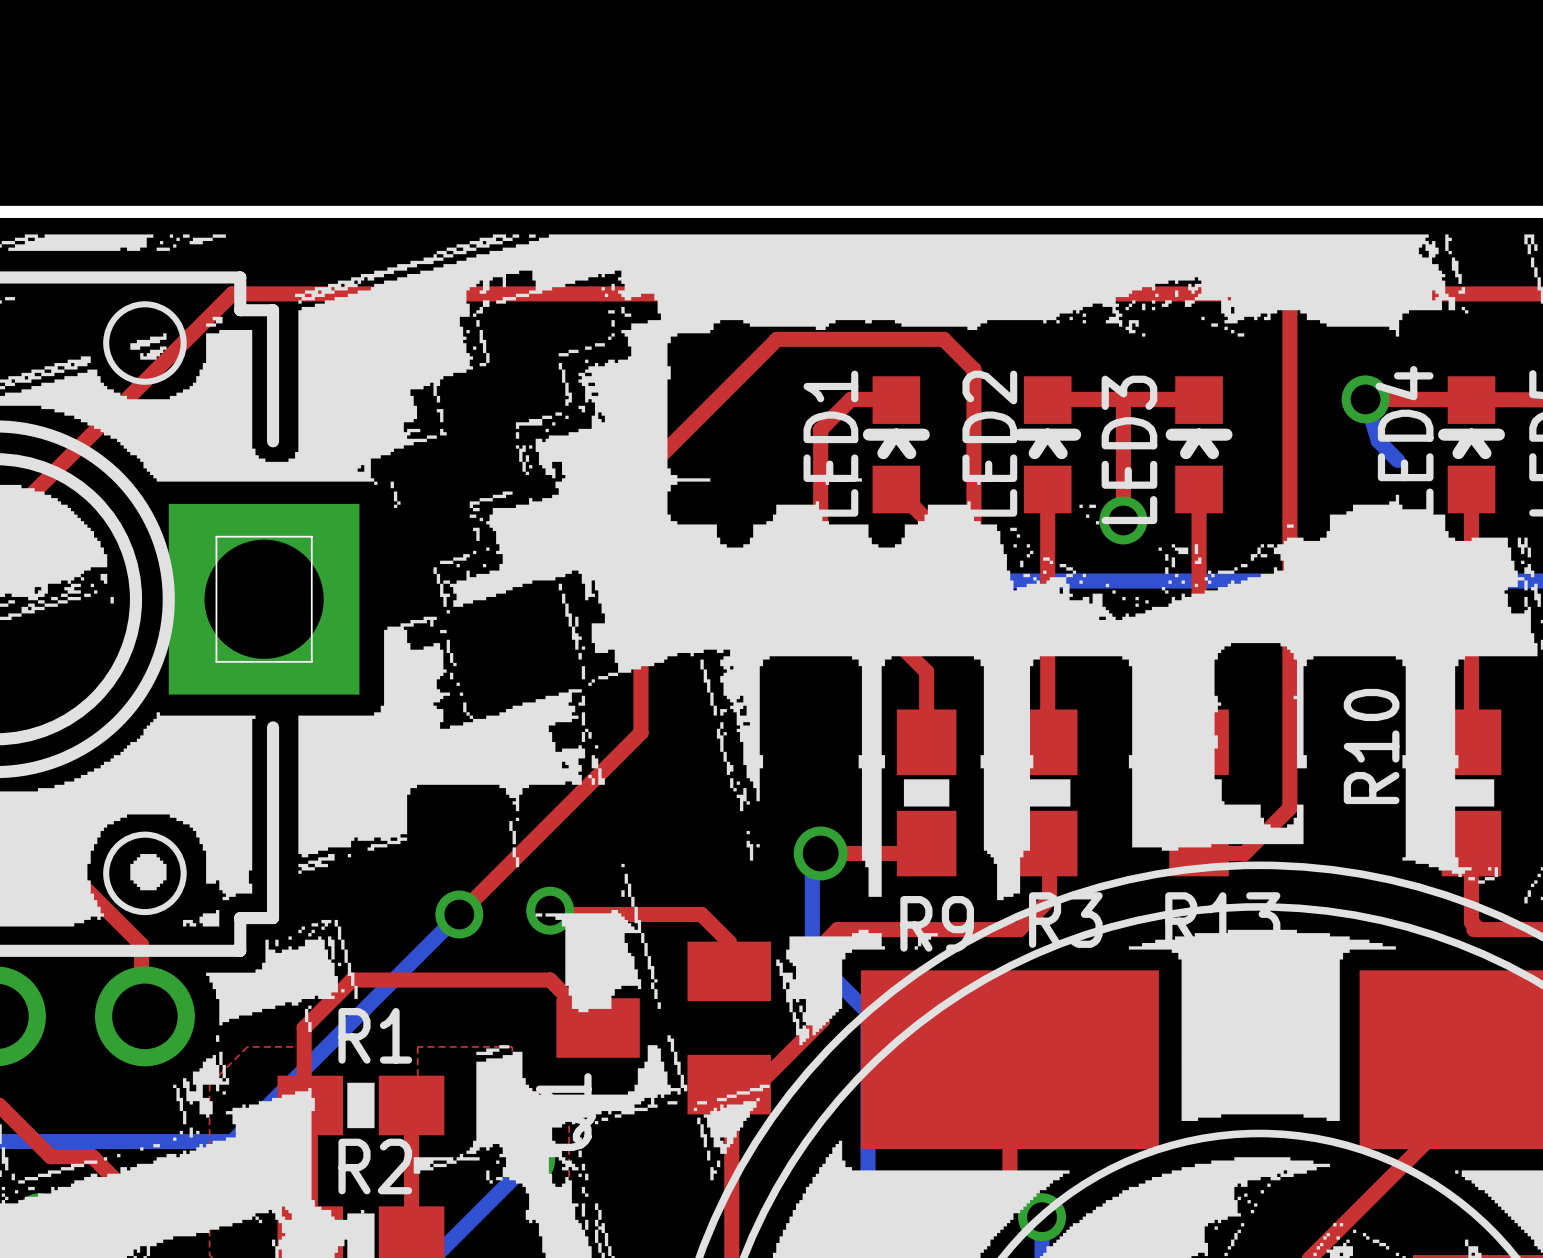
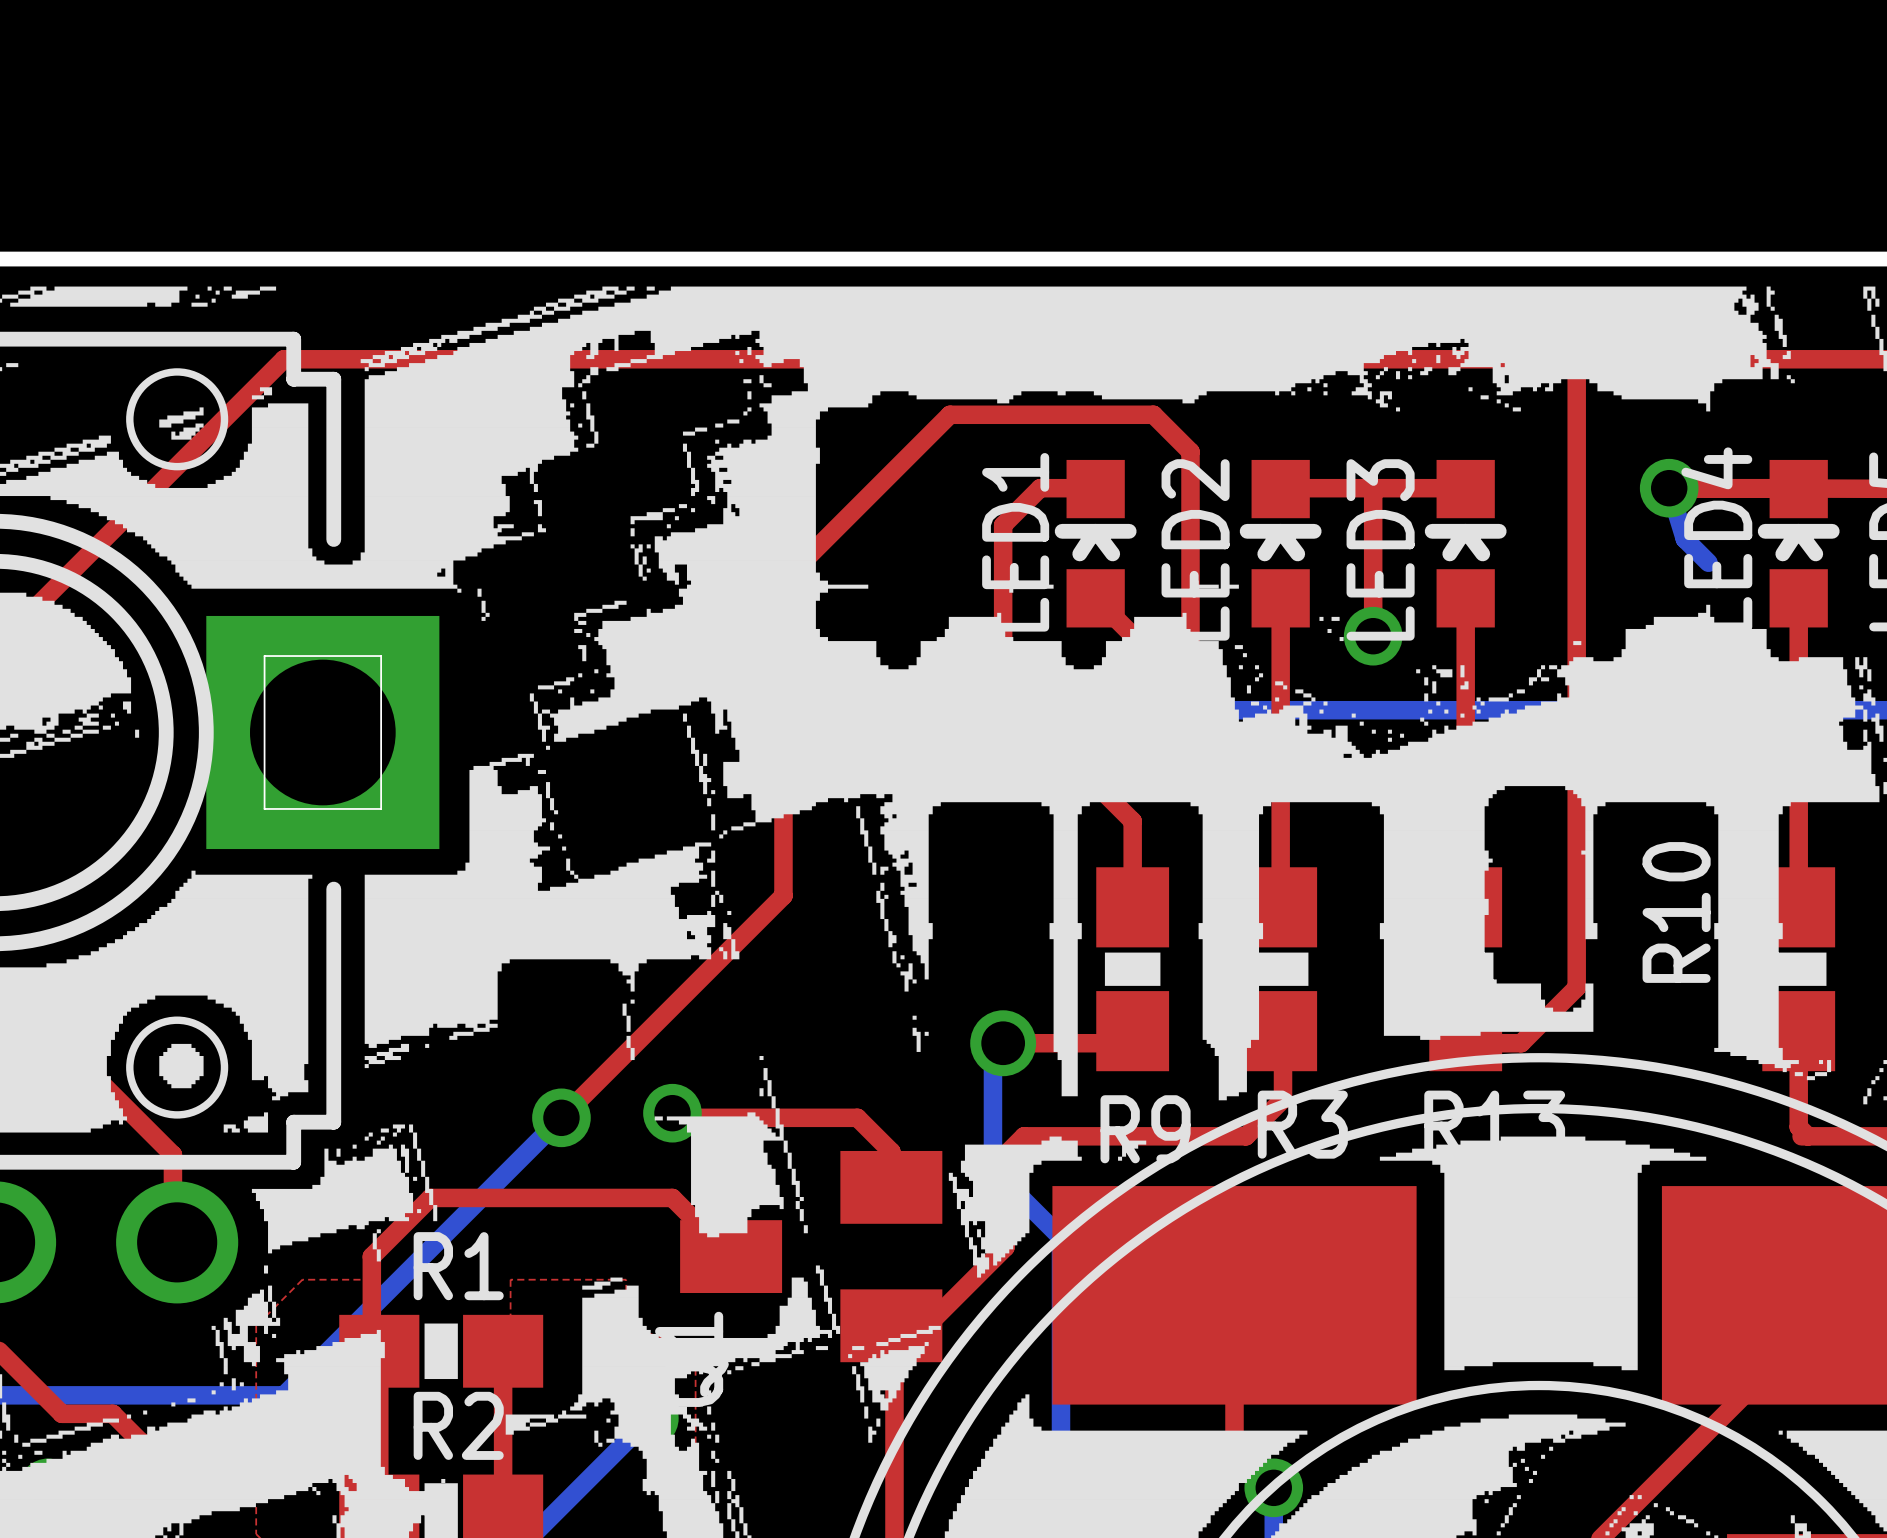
LED2 name position: LED2 (989, 443) -> LED2 (1195, 549)

